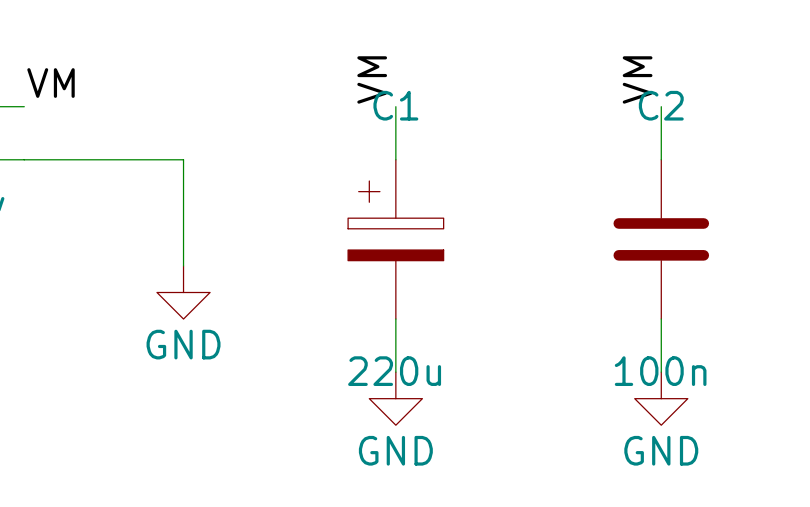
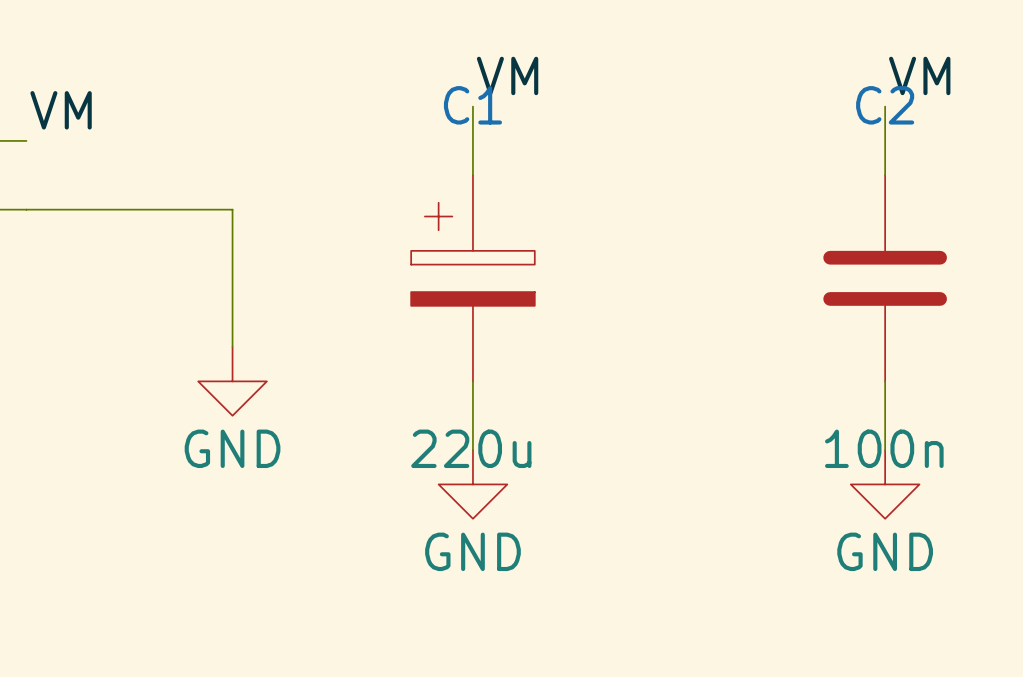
label rotation: 0° (372, 79) -> 90° clockwise (507, 75)
label rotation: 0° (637, 79) -> 90° clockwise (919, 75)
label position: VM (637, 79) -> VM (919, 75)
wire: (395, 106) (395, 159) -> (472, 106) (472, 175)
wire: (661, 106) (661, 159) -> (885, 106) (885, 175)
C1 position: (395, 239) -> (472, 278)
C2 position: (661, 239) -> (885, 278)
wire: (395, 319) (395, 372) -> (472, 381) (472, 450)
wire: (661, 319) (661, 372) -> (885, 381) (885, 450)
power symbol position: GND (395, 398) -> GND (472, 484)
power symbol position: GND (661, 398) -> GND (885, 484)

